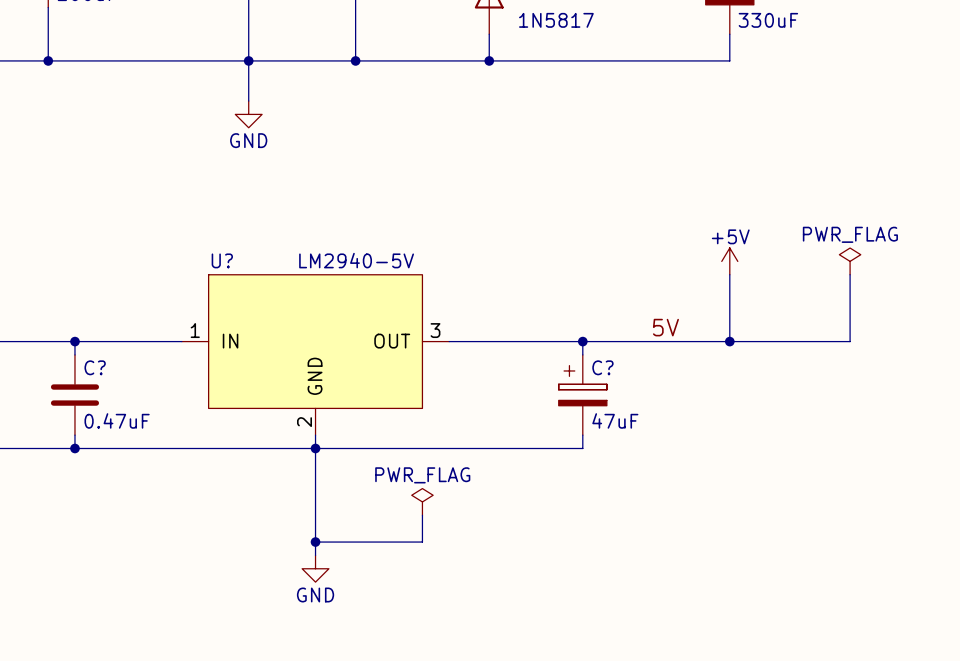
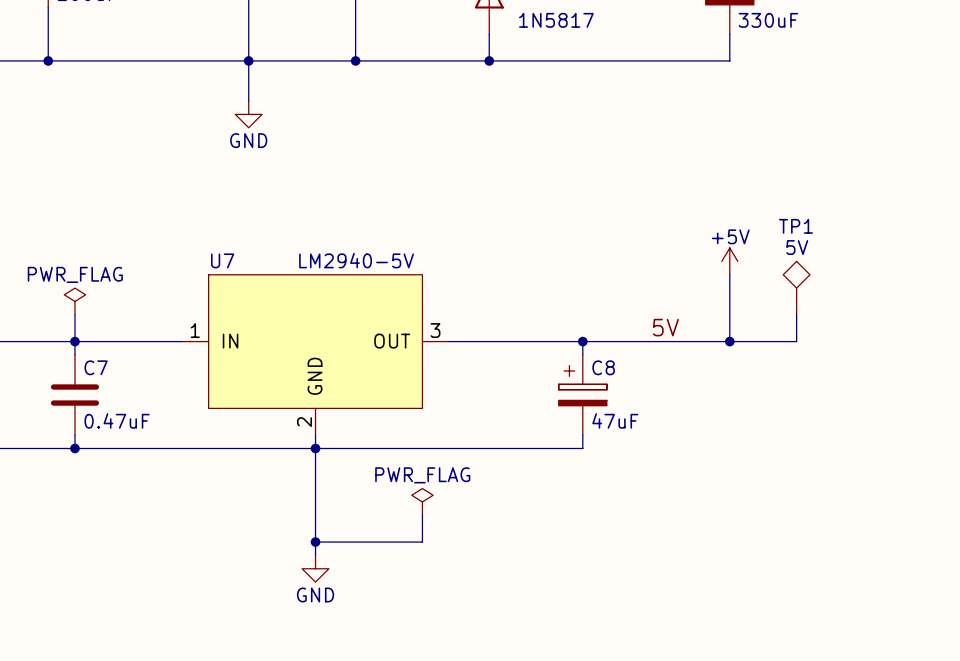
U? name: U? (222, 260) -> U7 (222, 260)
power symbol: PWR_FLAG (850, 261) -> none
wire: (850, 274) (850, 341) (796, 341) -> (796, 314) (796, 341)
TP1: none -> 5V (796, 288)
power symbol: none -> PWR_FLAG (74, 301)
wire: none -> (74, 314) (74, 341)
C? name: C? (95, 367) -> C7 (96, 367)
C? name: C? (602, 367) -> C8 (603, 367)

